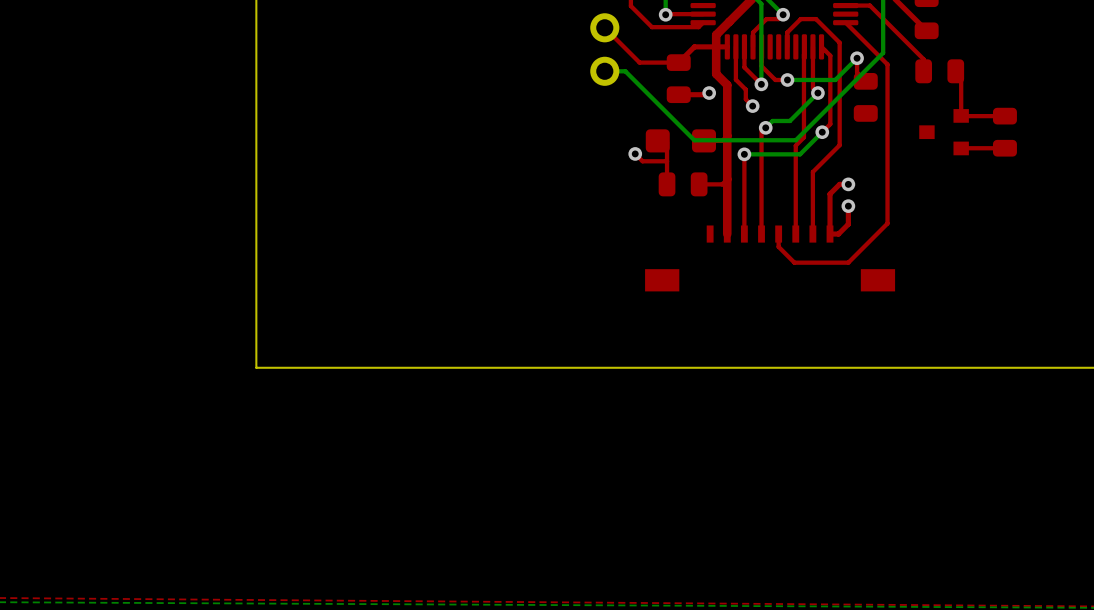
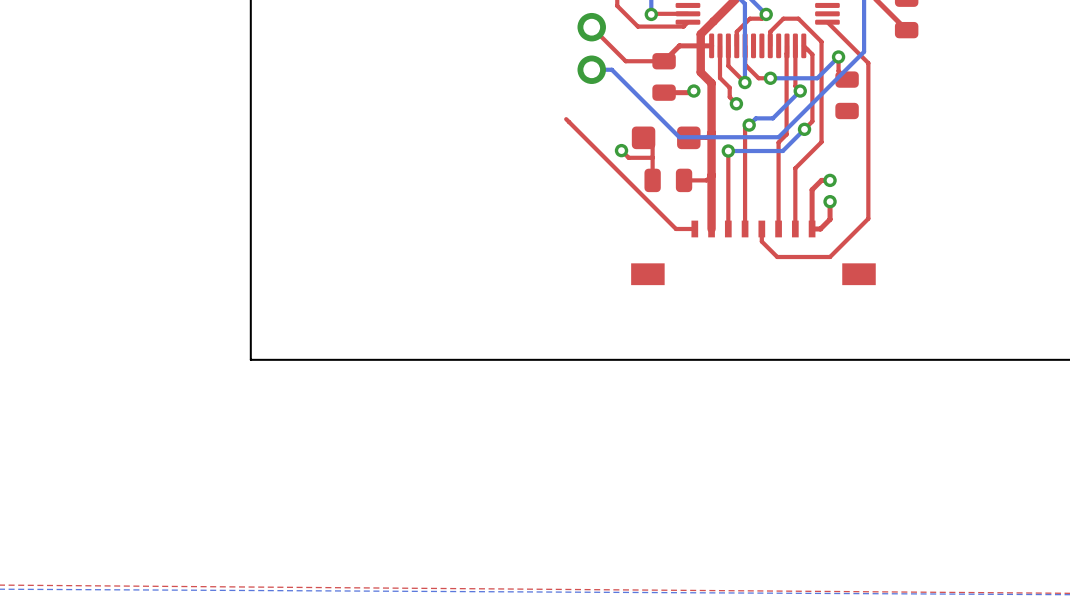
top track: (845, 5) (869, 5) (923, 59) (923, 71) -> none
part: (939, 71) -> none
top track: (955, 71) (961, 76) (961, 115) -> none
top track: (1004, 116) (961, 116) -> none
top track: none -> (566, 119) (676, 228) (694, 228)
part: (944, 132) -> none
part: (1004, 132) -> none
top track: (961, 148) (1004, 148) (1004, 153) -> none

